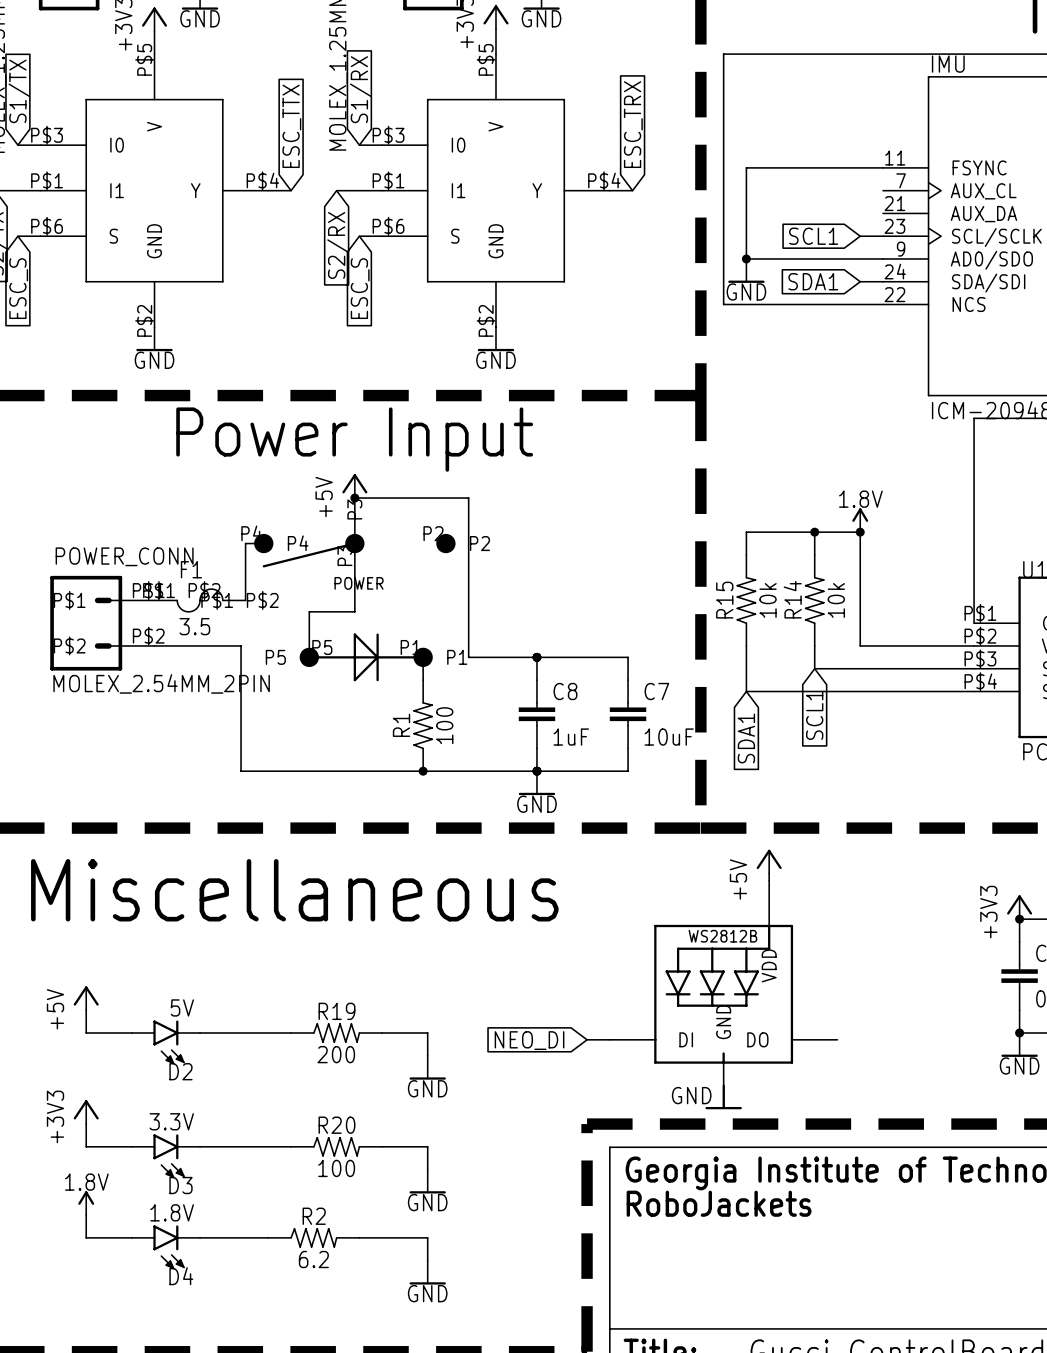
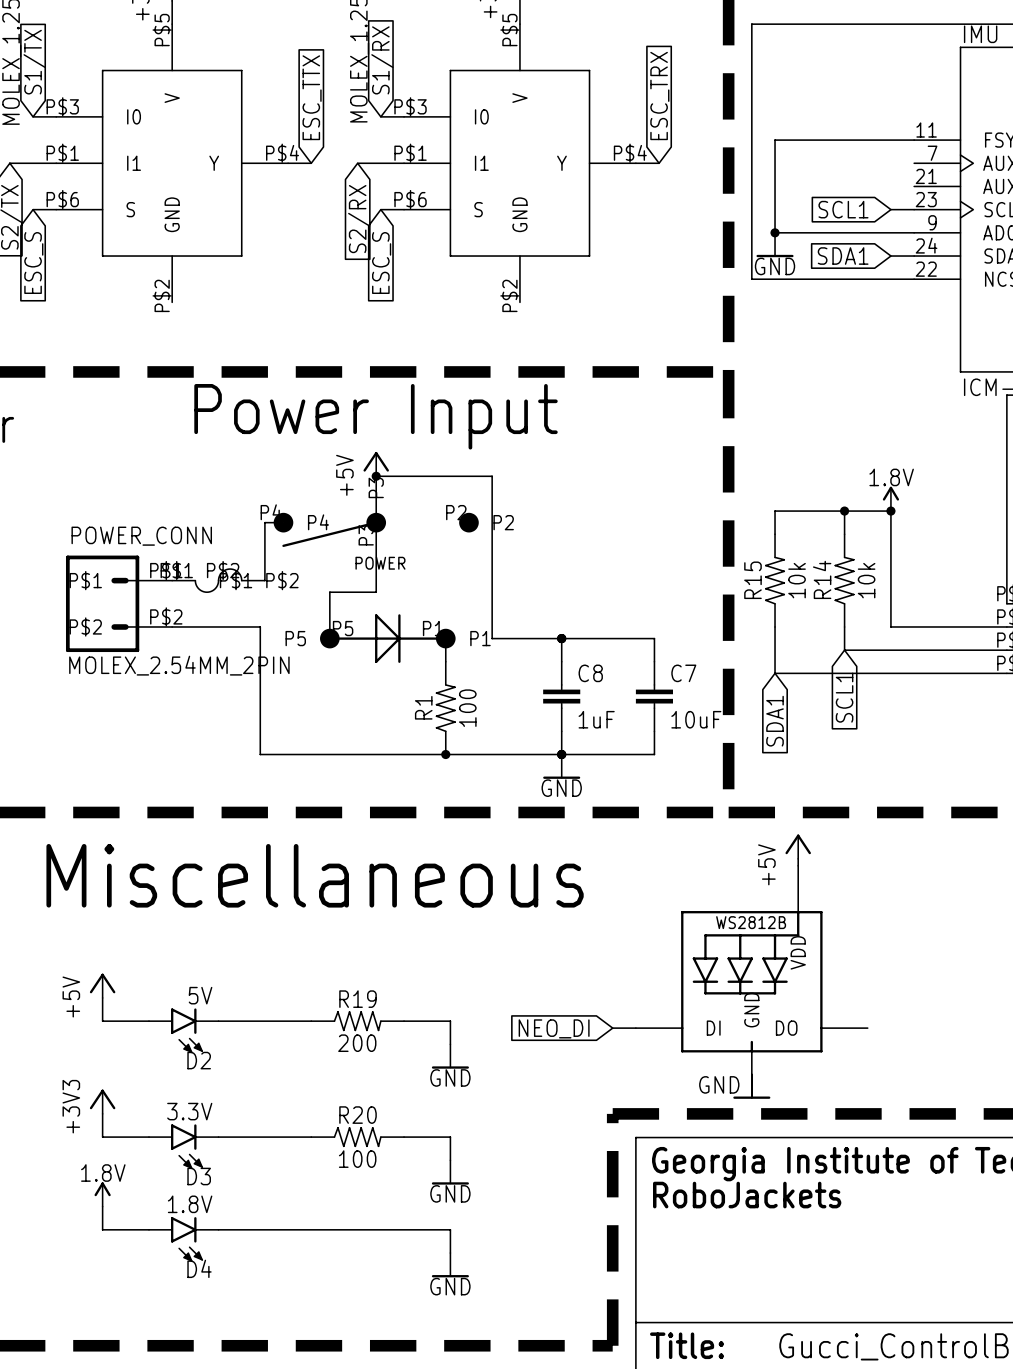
power symbol: GND (154, 339) -> none
power symbol: GND (495, 339) -> none
F1 name: F1 (191, 569) -> none
F1 value: 3.5 (194, 626) -> none
R2: 6.2 (313, 1237) -> none

